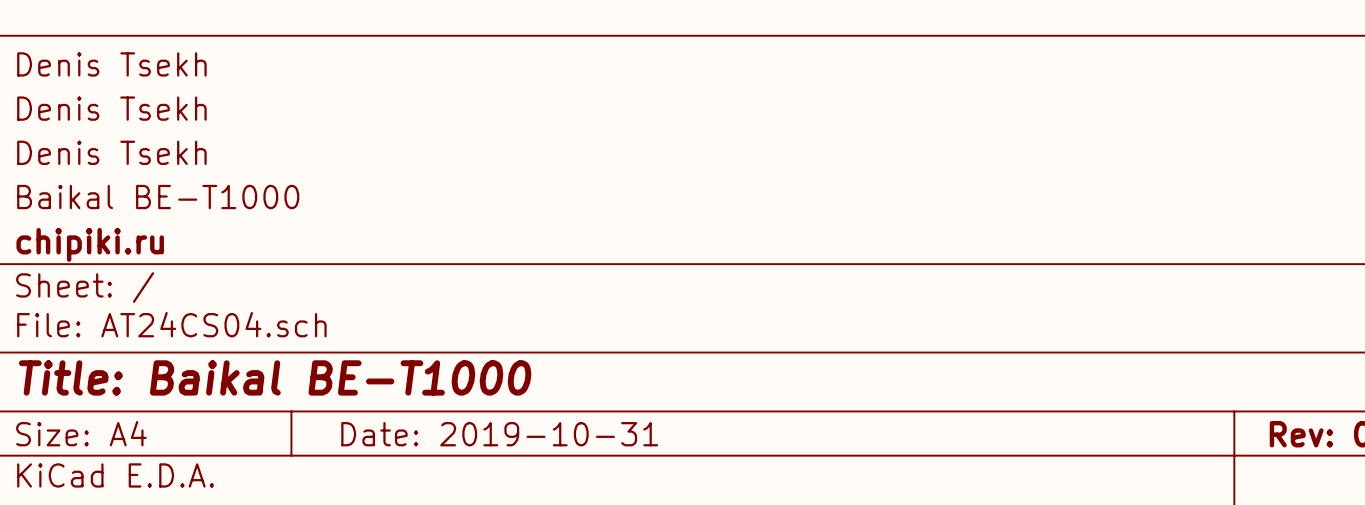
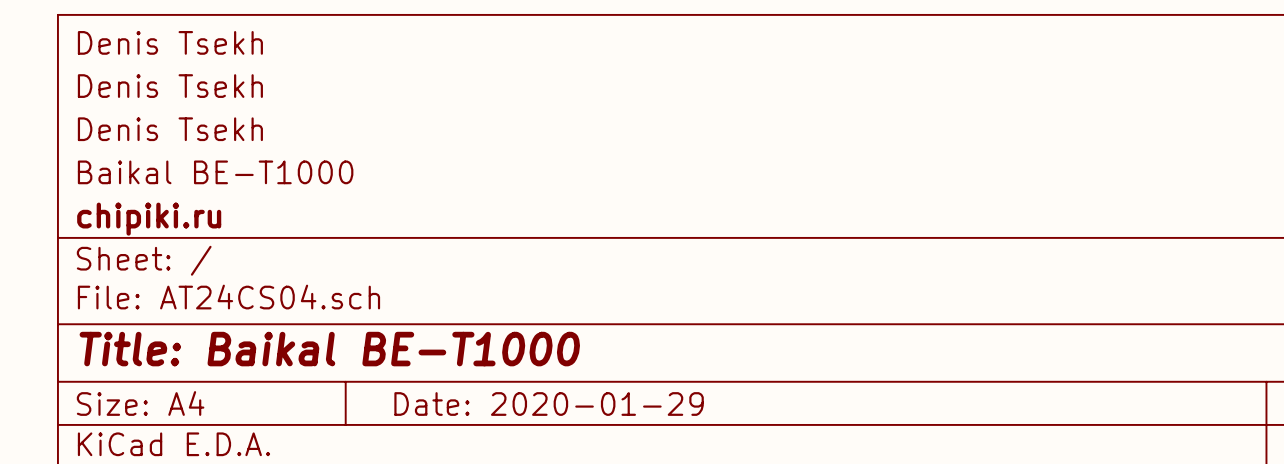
title block: Date: 2019-10-31 (499, 434) -> Date: 2020-01-29 (549, 404)

